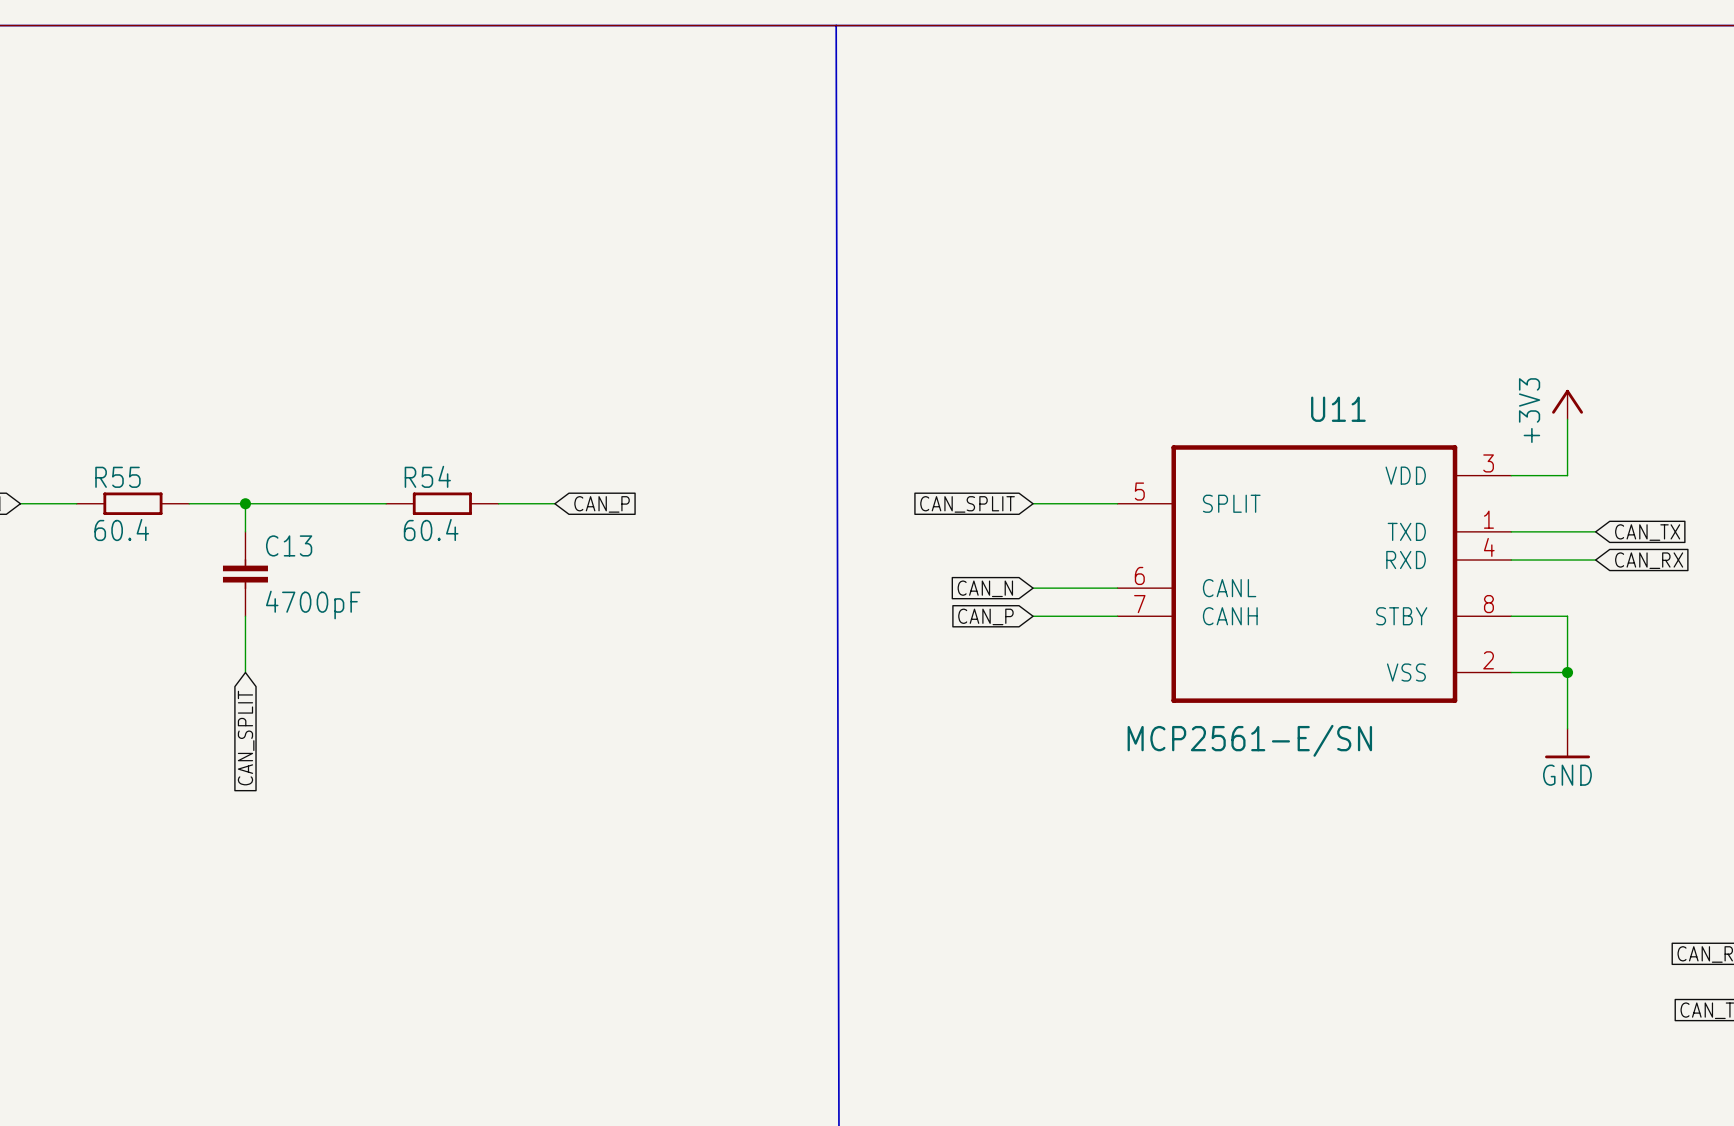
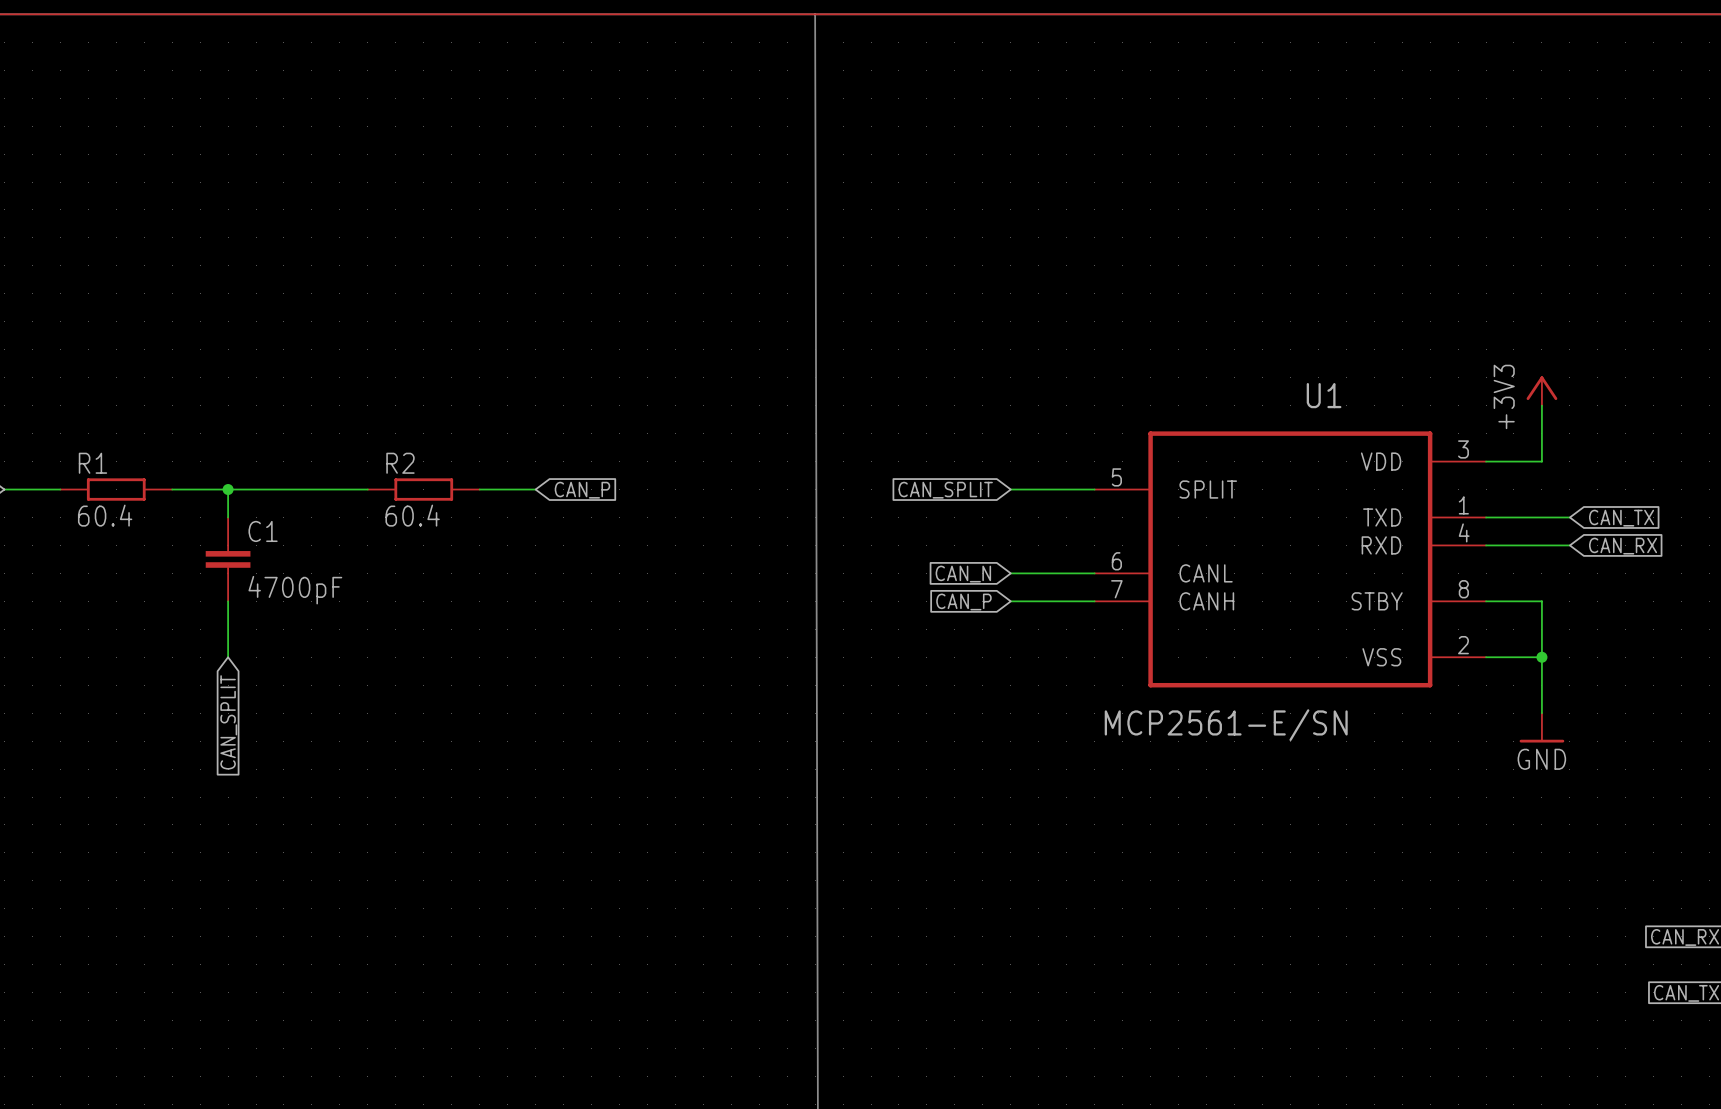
U11 name: U11 (1338, 409) -> U1 (1324, 395)
R54 name: R54 (427, 476) -> R2 (400, 463)
R55 name: R55 (117, 477) -> R1 (92, 463)
C13 name: C13 (289, 545) -> C1 (263, 531)

